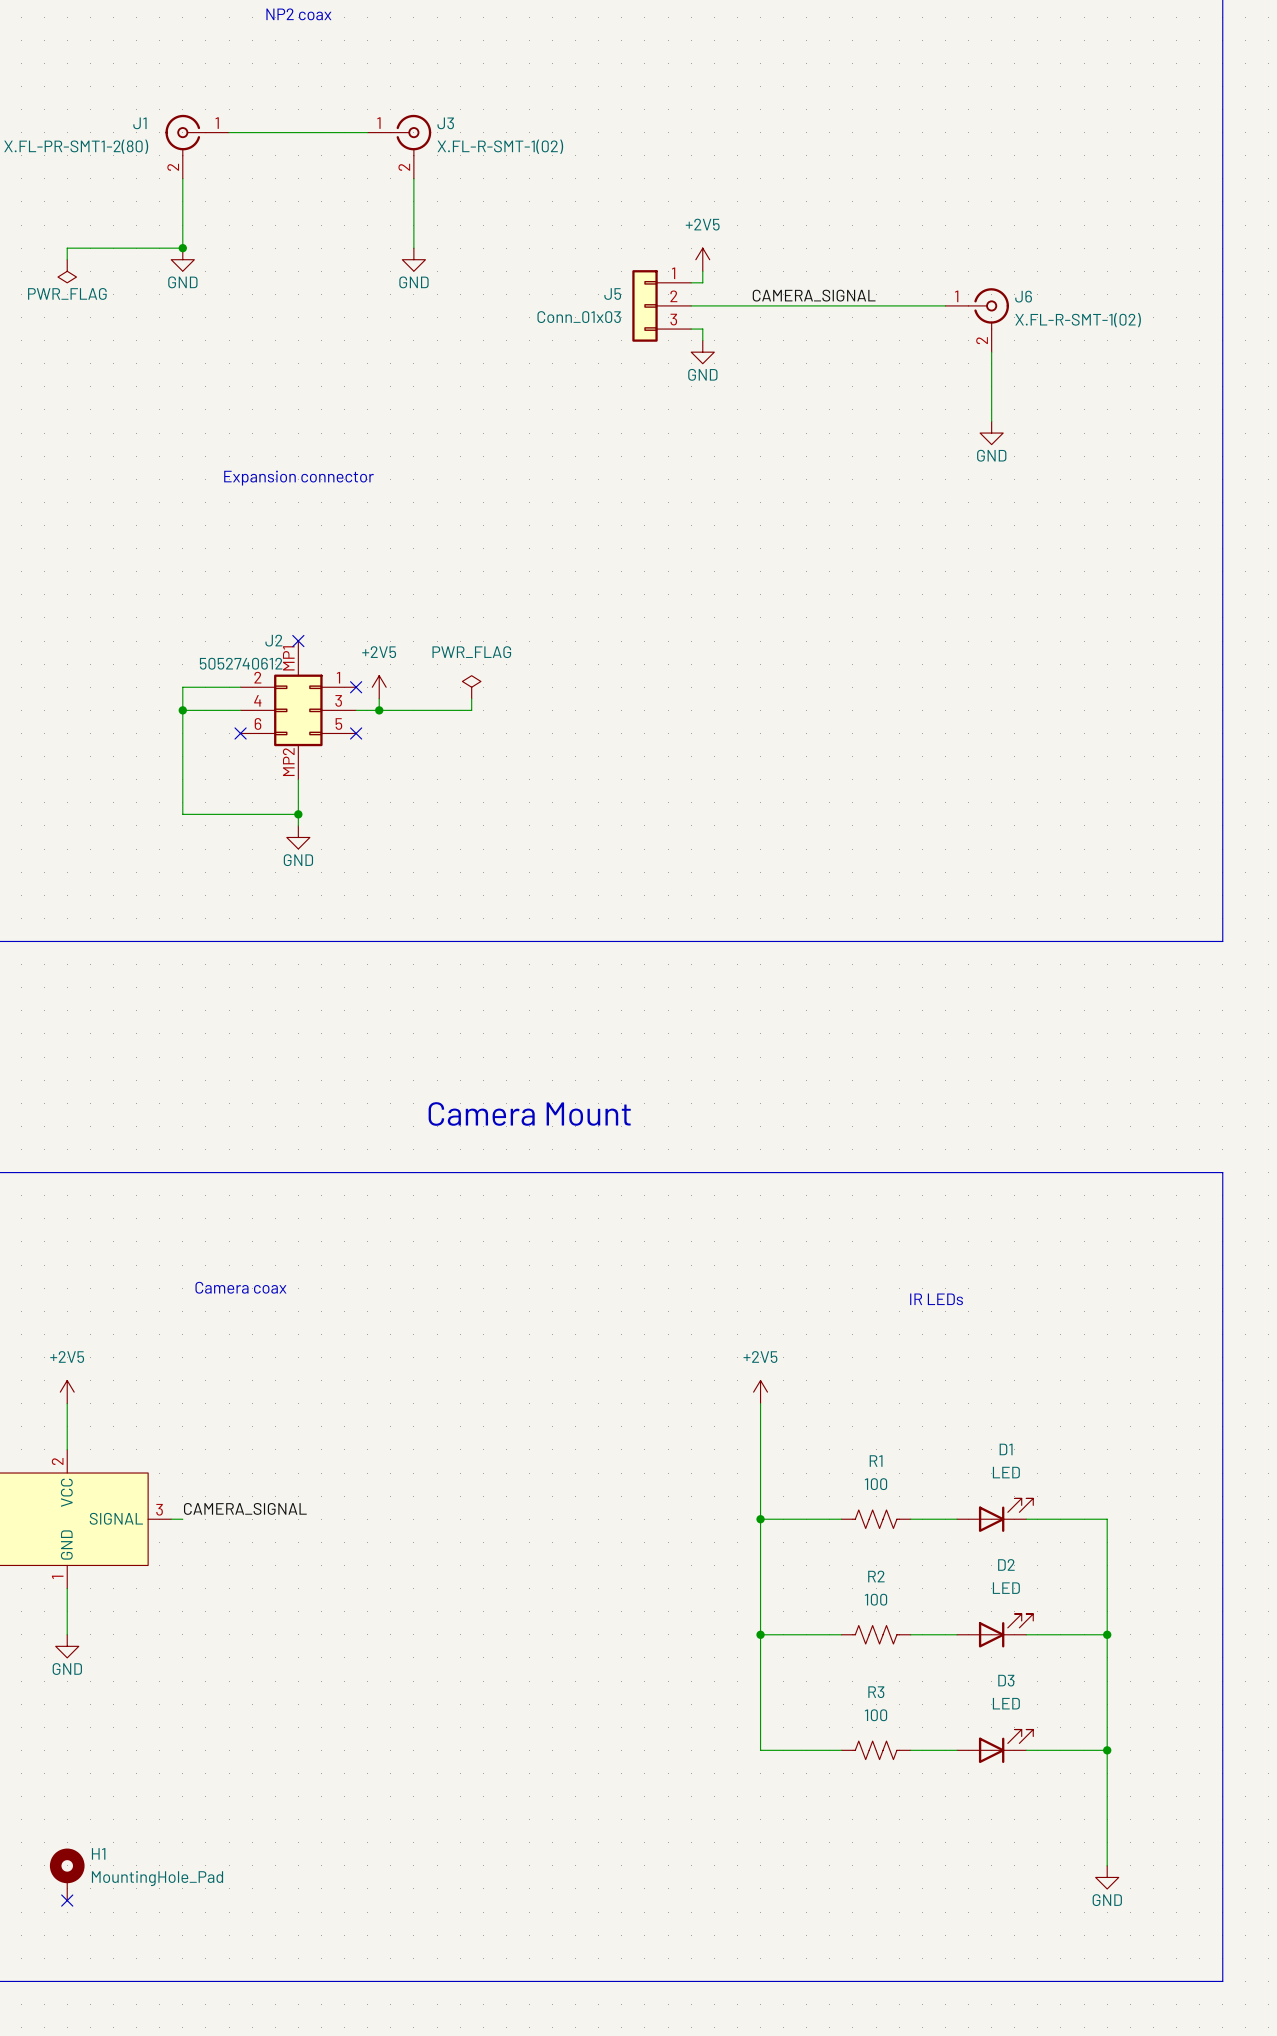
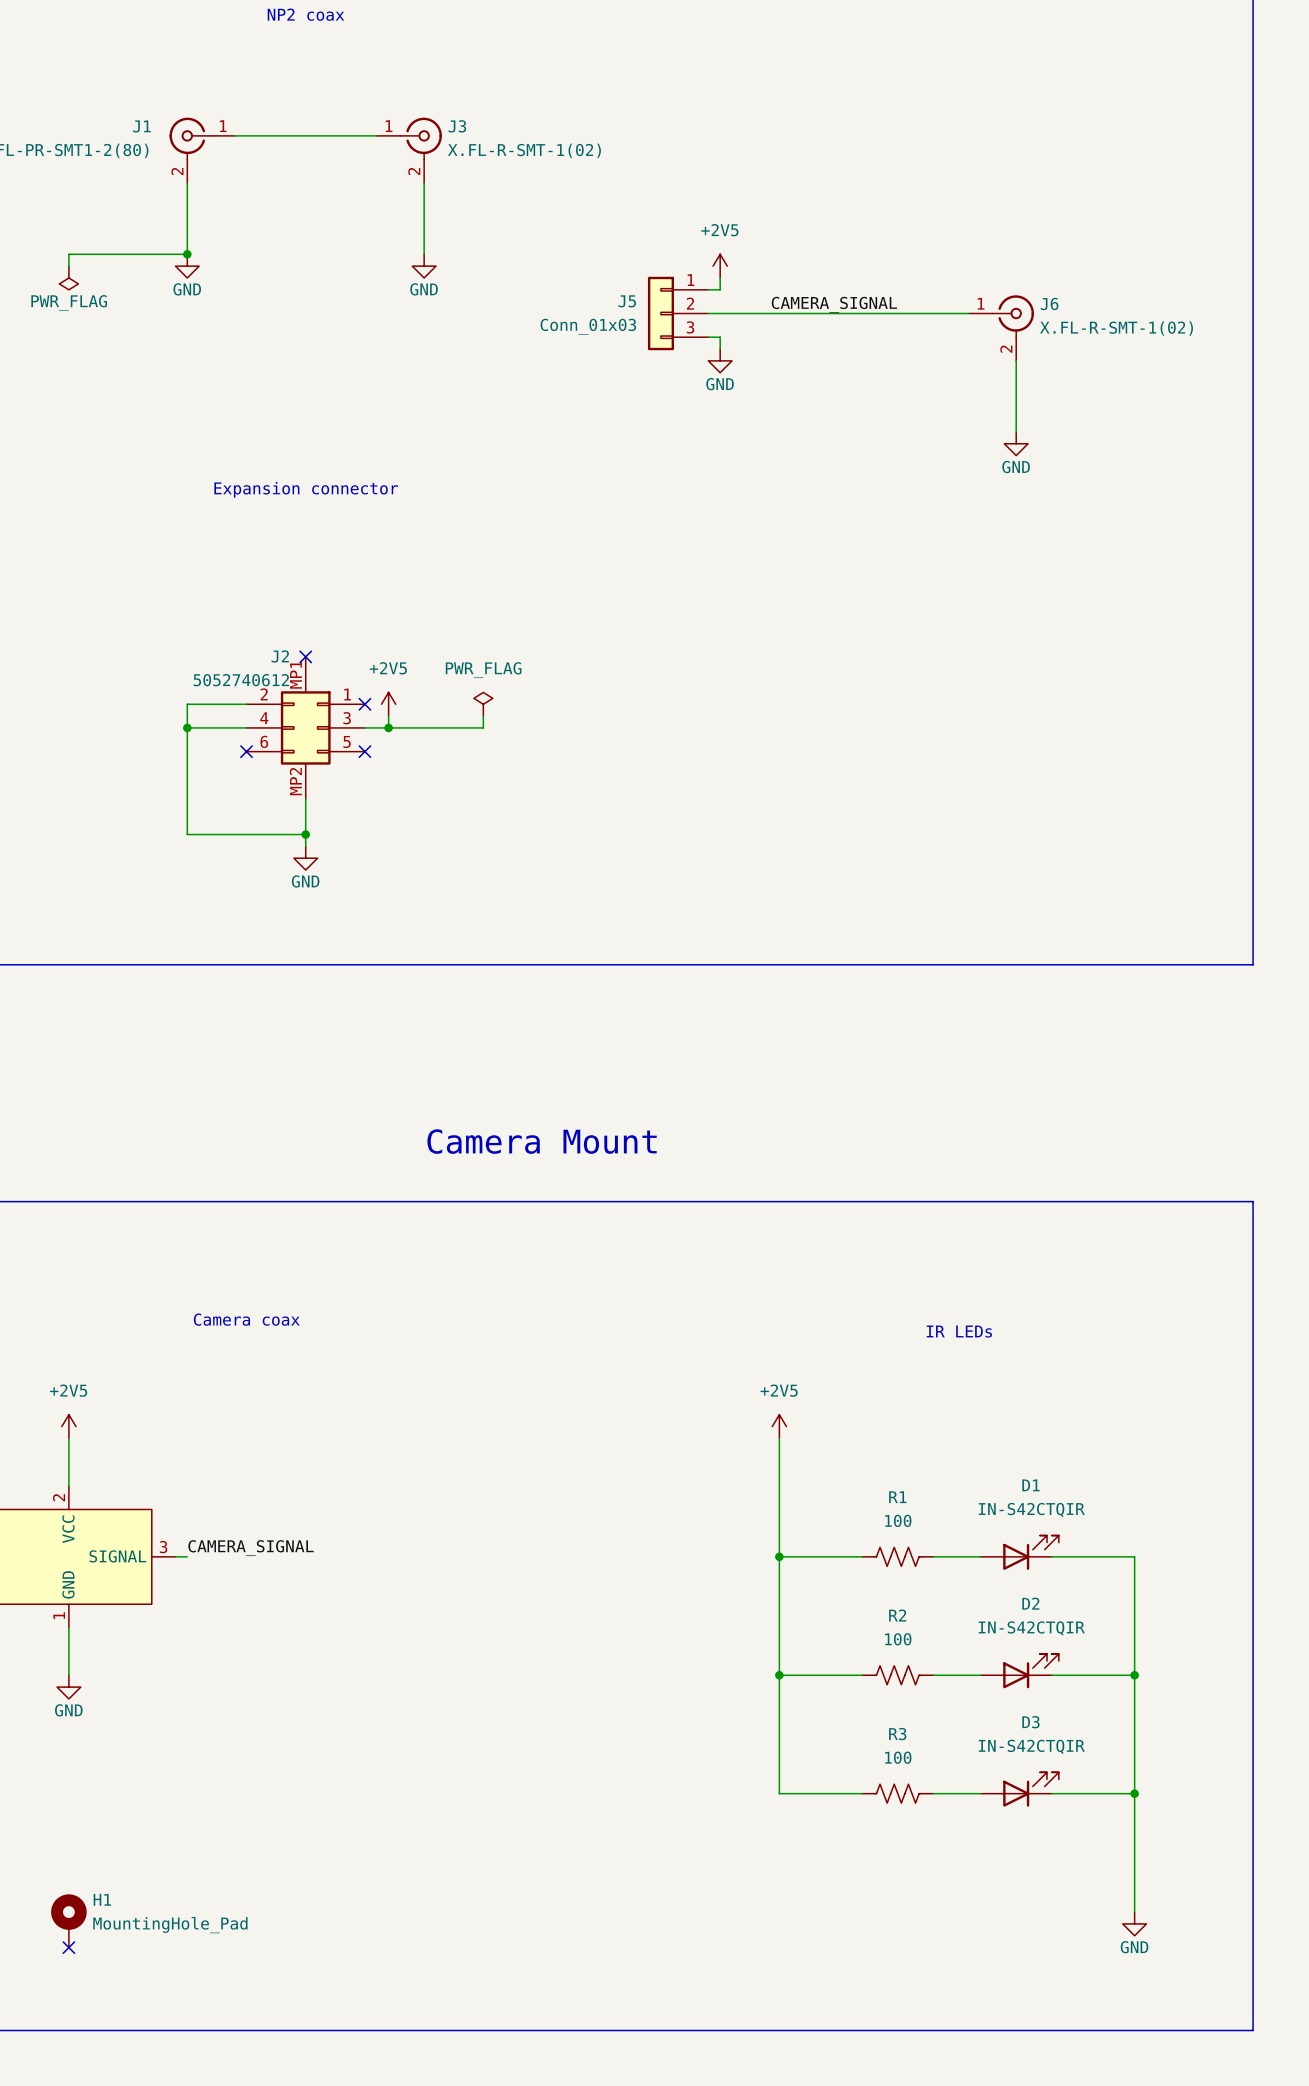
D1 value: LED (1006, 1472) -> IN-S42CTQIR (1031, 1510)
D2 value: LED (1006, 1588) -> IN-S42CTQIR (1031, 1628)
D3 value: LED (1006, 1703) -> IN-S42CTQIR (1031, 1746)

